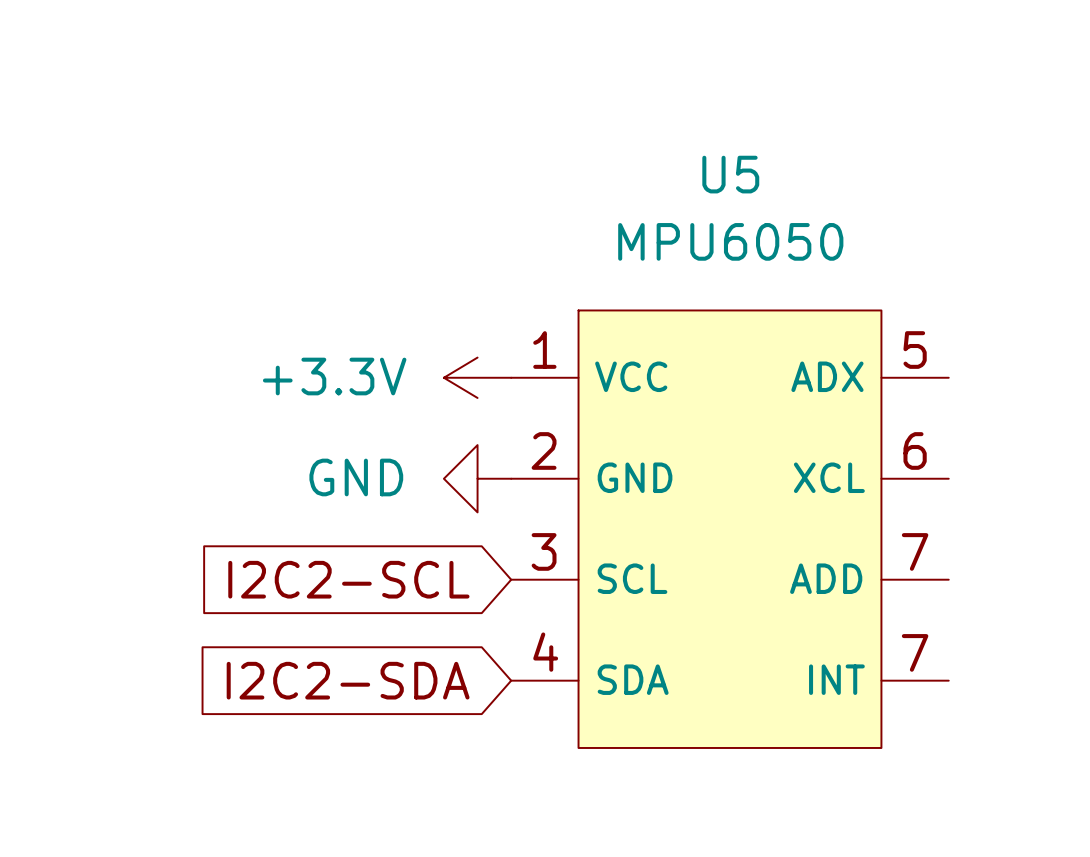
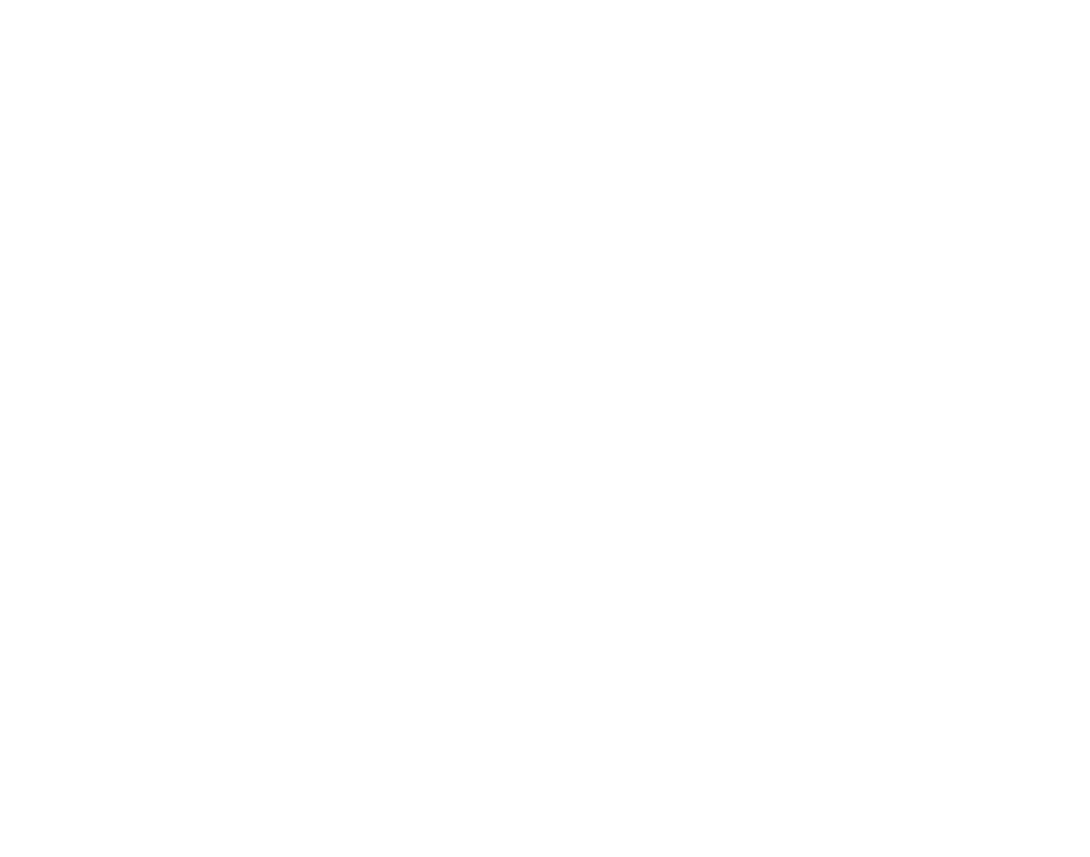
power symbol: +3.3V (477, 377) -> none
power symbol: GND (477, 478) -> none
U5: MPU6050 (729, 529) -> none
global label: I2C2-SCL (348, 579) -> none
global label: I2C2-SDA (348, 680) -> none

